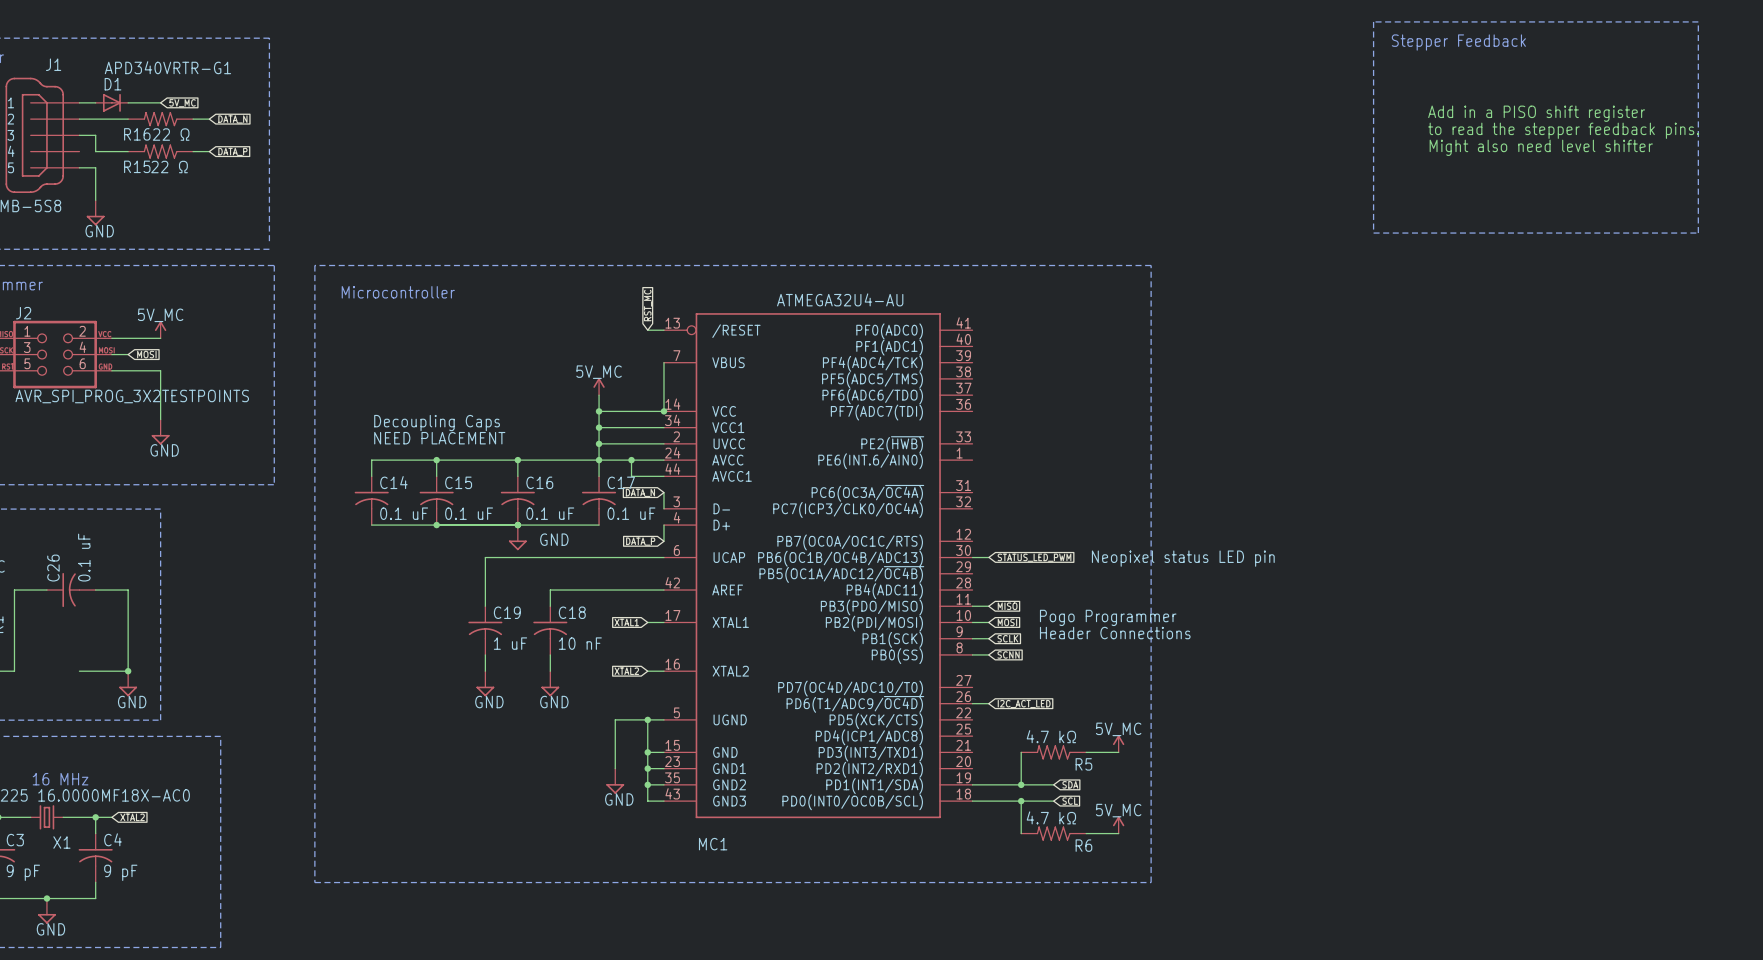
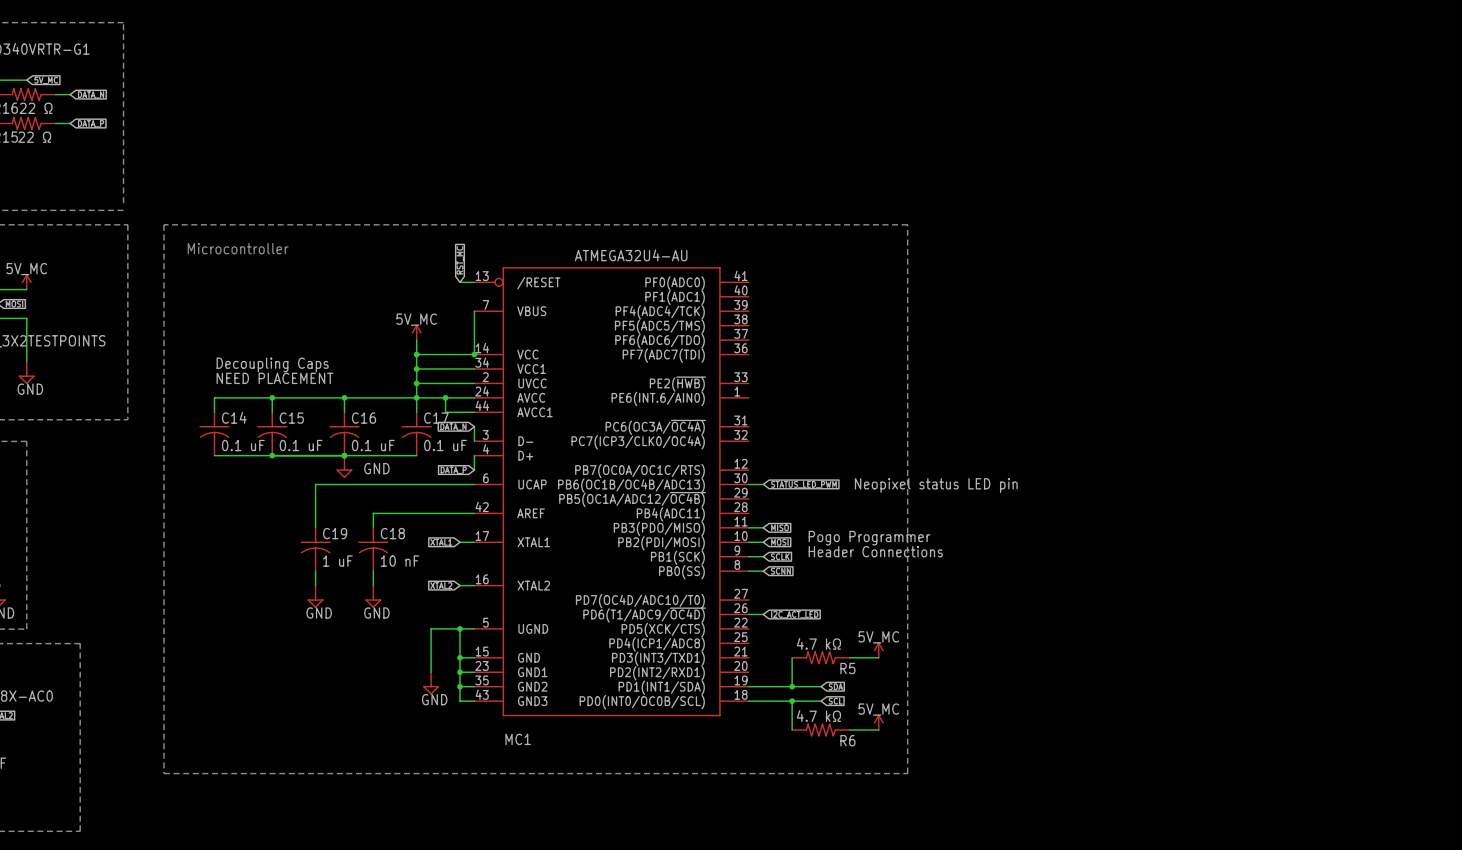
line: (1373, 21) (1373, 233) (1698, 233) (1698, 21) (1373, 21) -> none
text: Stepper Feedback (1458, 42) -> none
text: Add in a PISO shift register (1536, 113) -> none
text: to read the stepper feedback pins. (1563, 130) -> none
text: Might also need level shifter (1541, 147) -> none

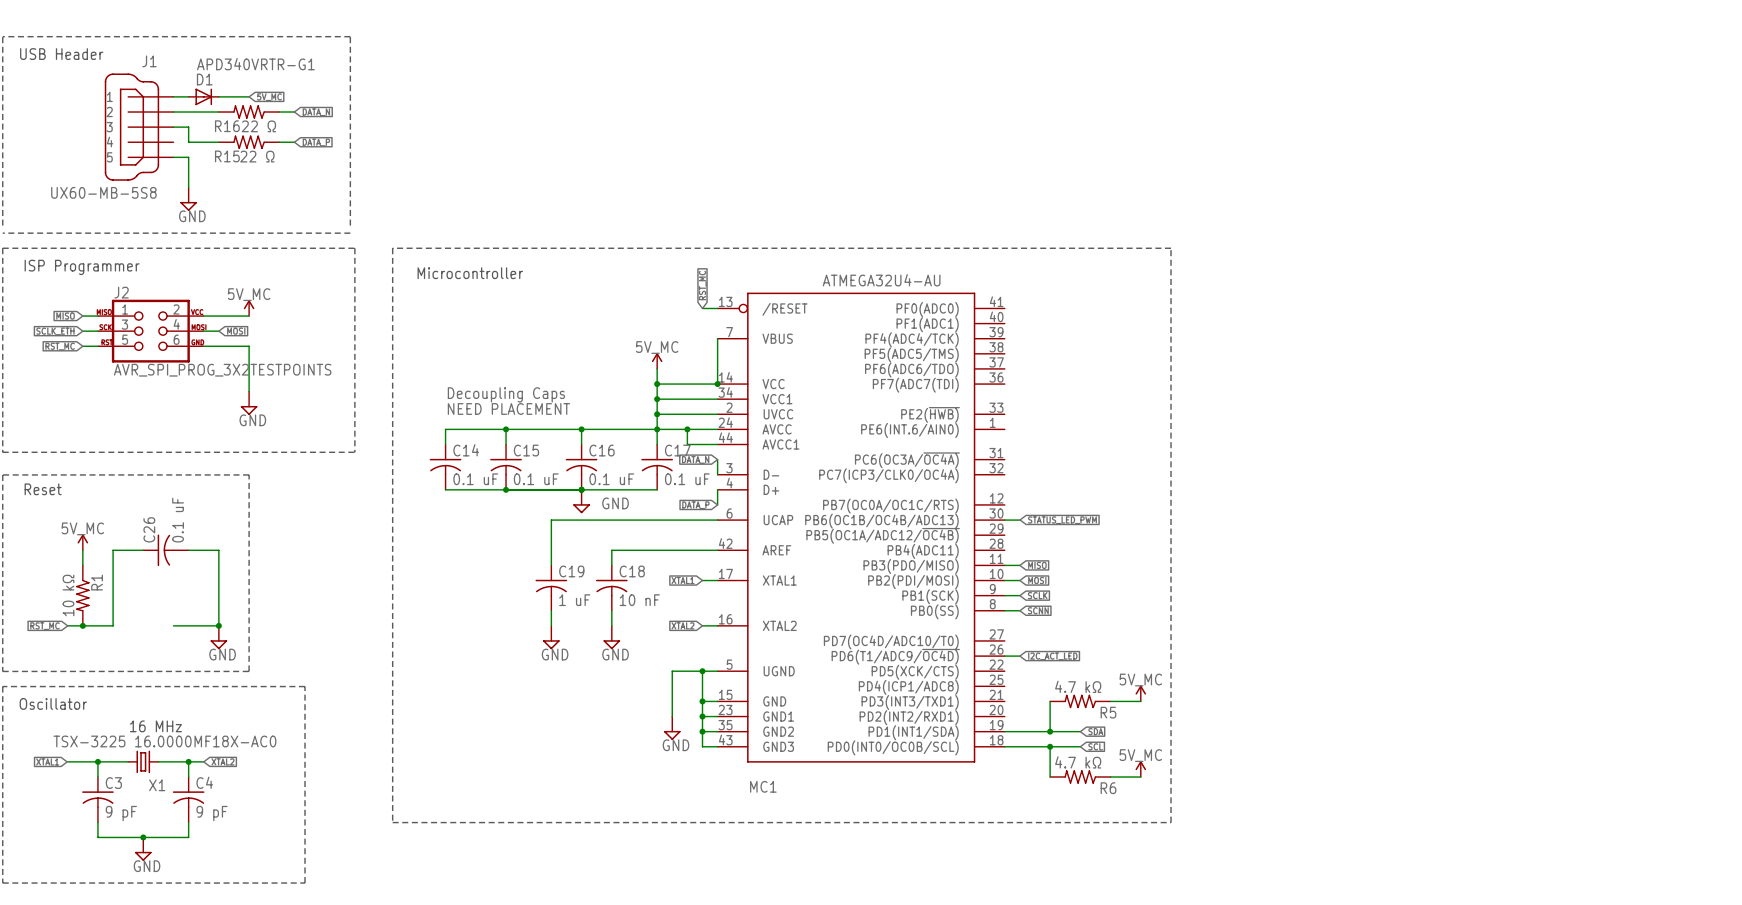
text: Neopixel status LED pin (936, 485) -> none
text: Pogo Programmer (869, 538) -> none
text: Header Connections (875, 551) -> none

